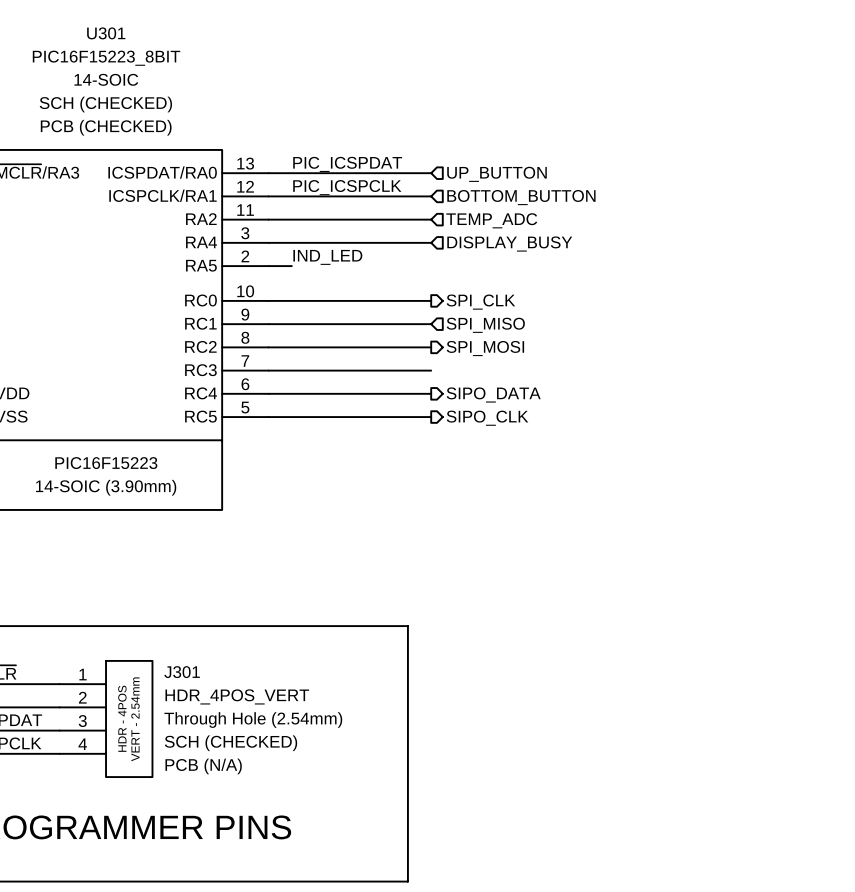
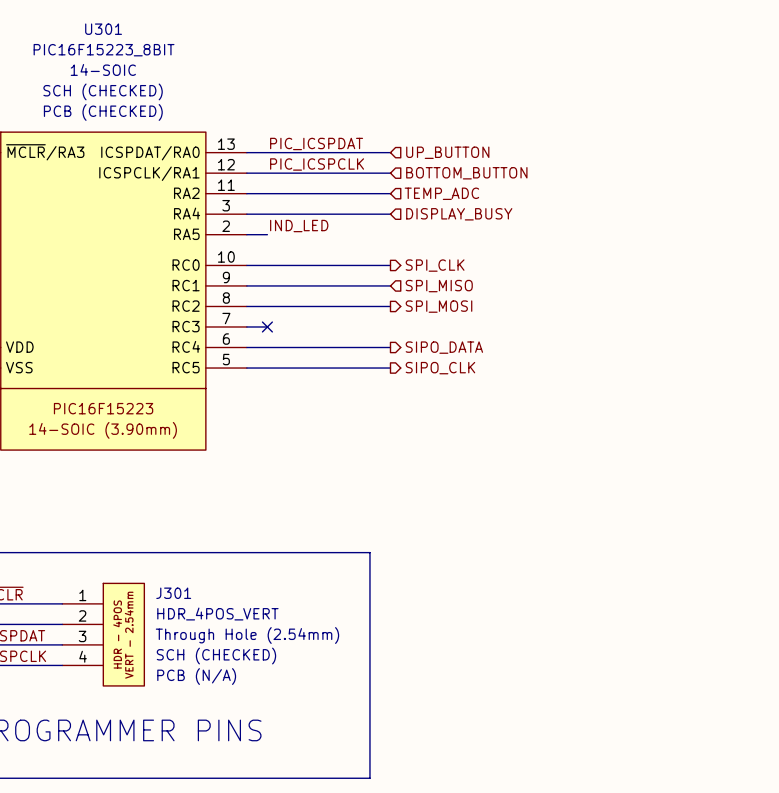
wire: (291, 370) (431, 370) -> none
no-connect mark: none -> (267, 326)

